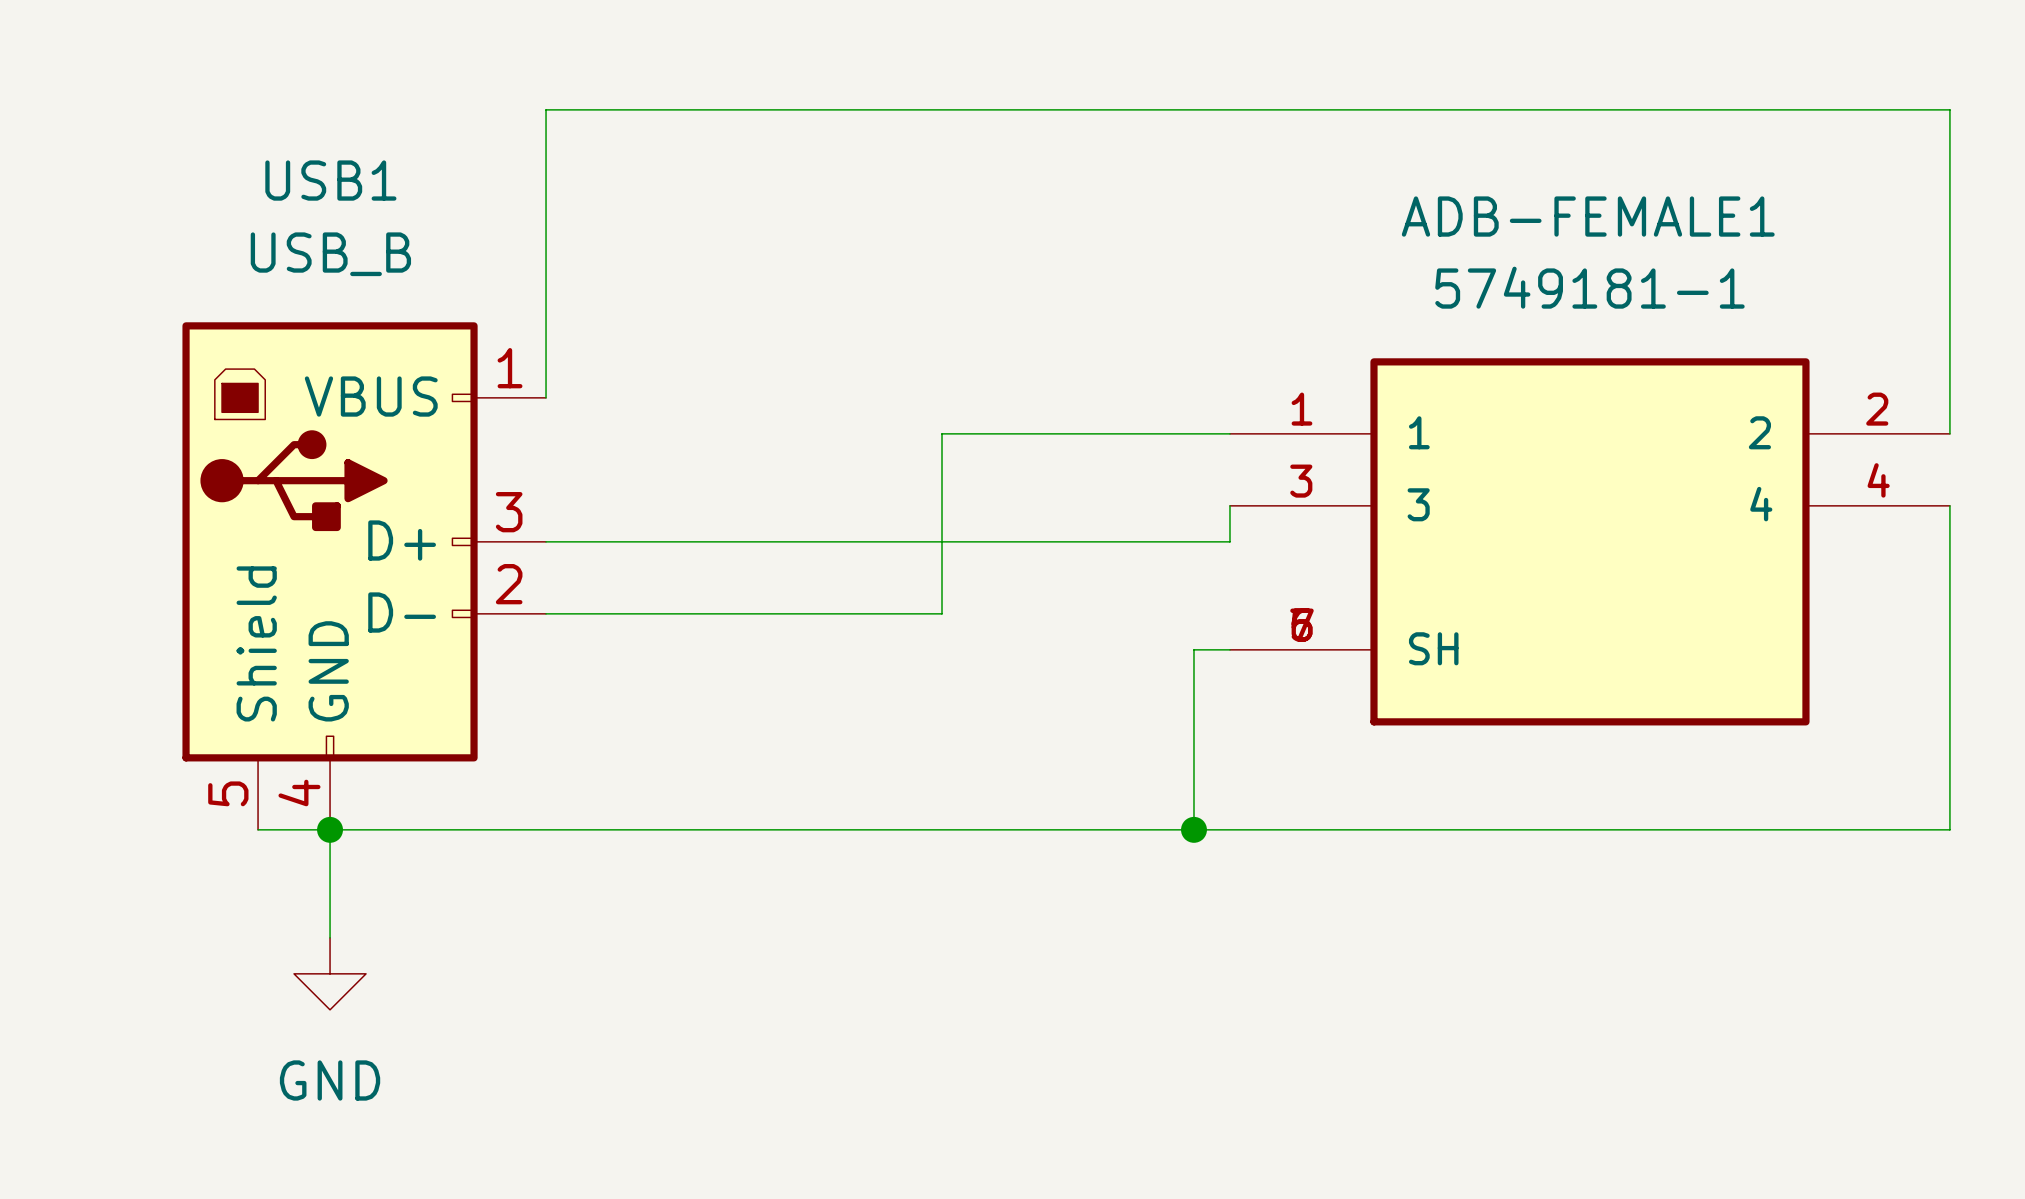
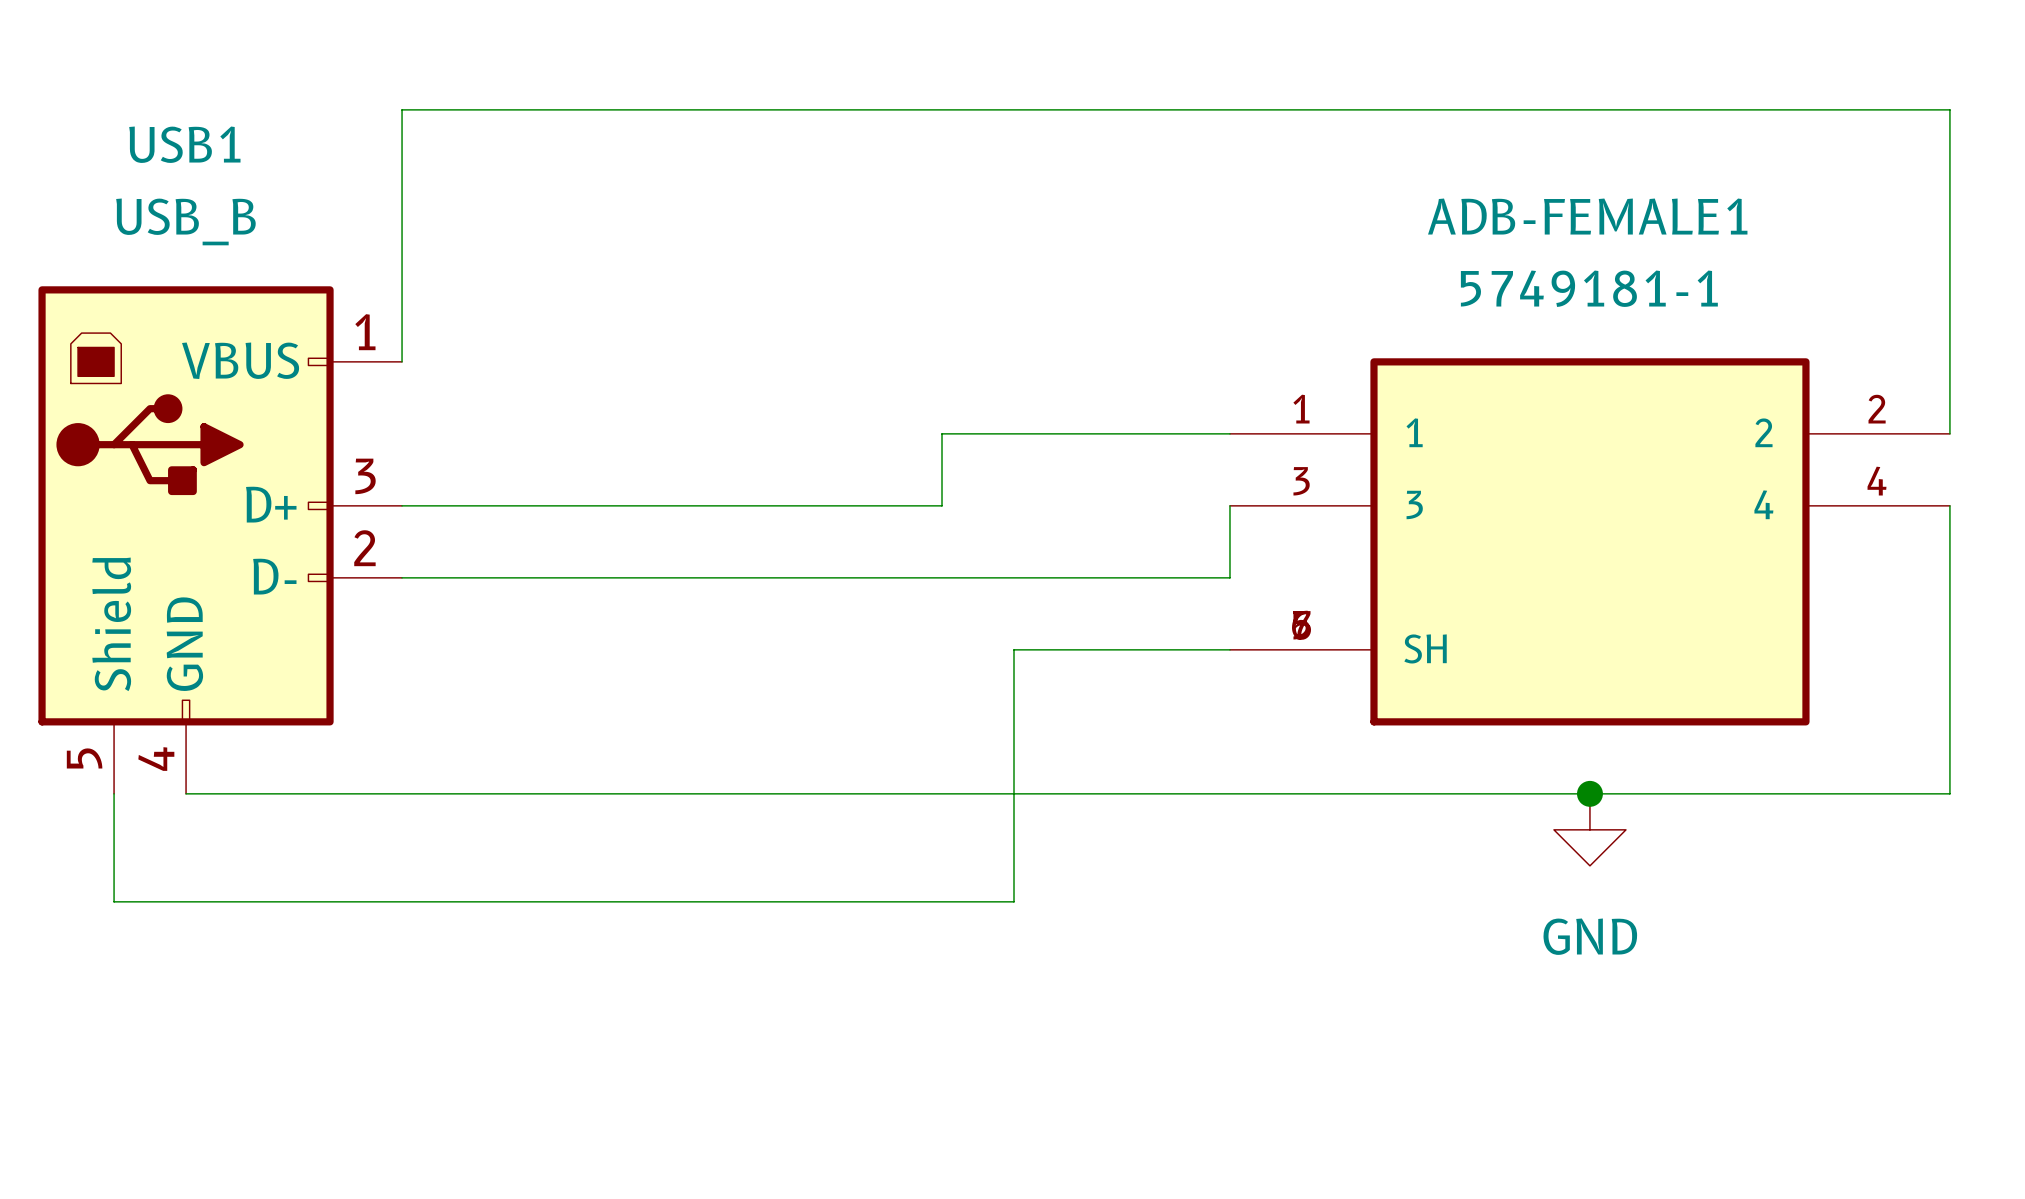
wire: (546, 109) (546, 397) -> (546, 109) (402, 109) (402, 361)
wire: (942, 505) (942, 613) (546, 613) -> (942, 505) (402, 505)
wire: (546, 541) (1229, 541) -> (402, 577) (1229, 577) (1229, 541)
USB1 position: (364, 576) -> (220, 540)
wire: (1193, 649) (1193, 829) -> (1193, 649) (1013, 649) (1013, 901) (114, 901) (114, 793)
junction: none -> (1589, 793)
wire: (1949, 793) (1949, 829) (258, 829) -> (1949, 793) (186, 793)
wire: (330, 829) (330, 937) -> none
junction: (330, 829) -> none
junction: (1193, 829) -> none
power symbol: none -> GND (1589, 829)
power symbol: GND (330, 973) -> none

